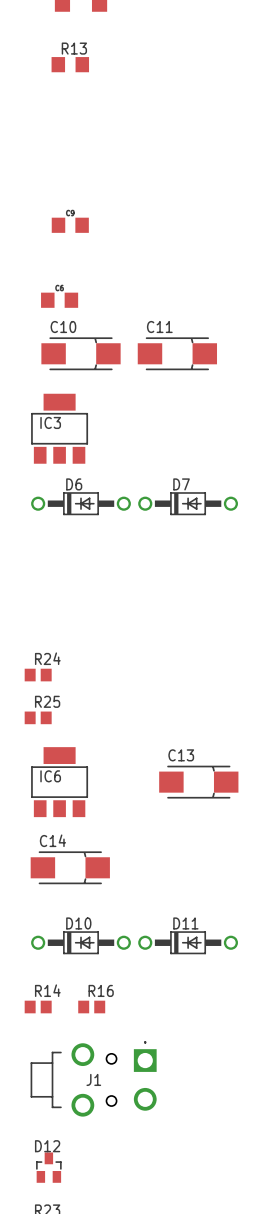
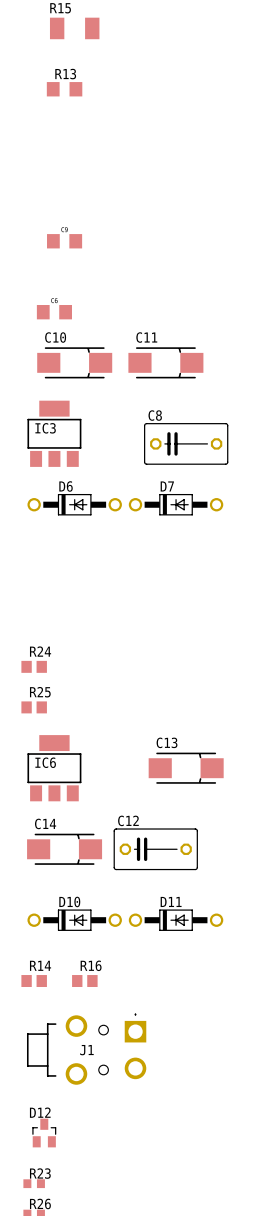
C8: none -> (186, 443)
C12: none -> (155, 849)

